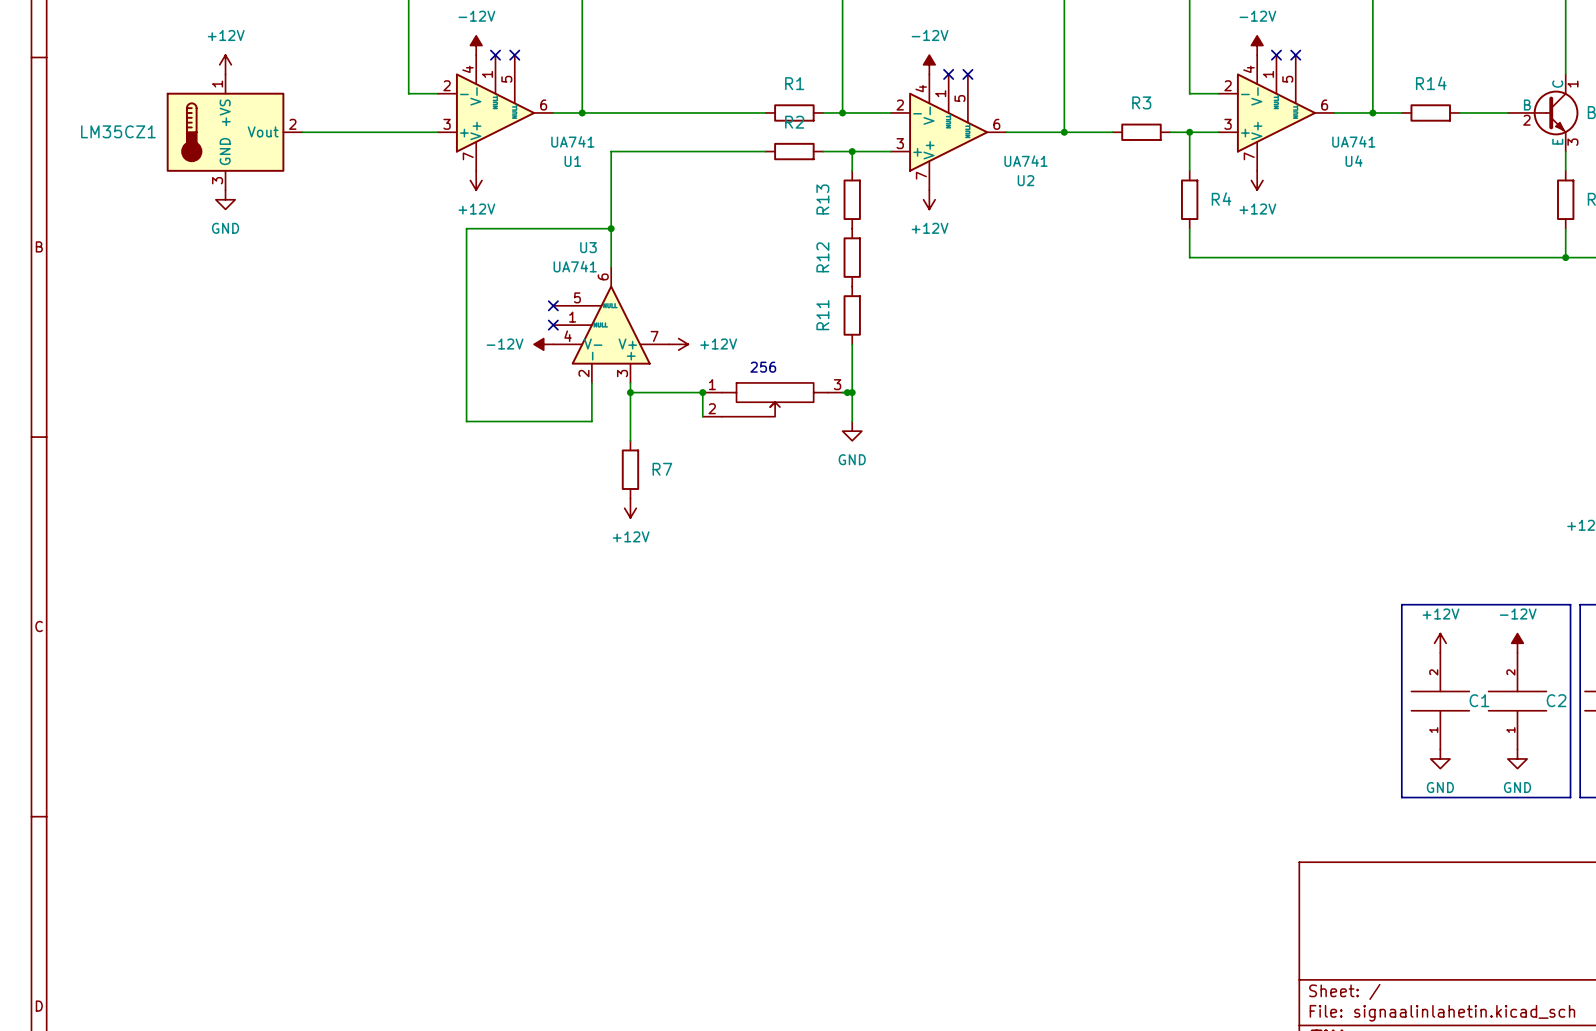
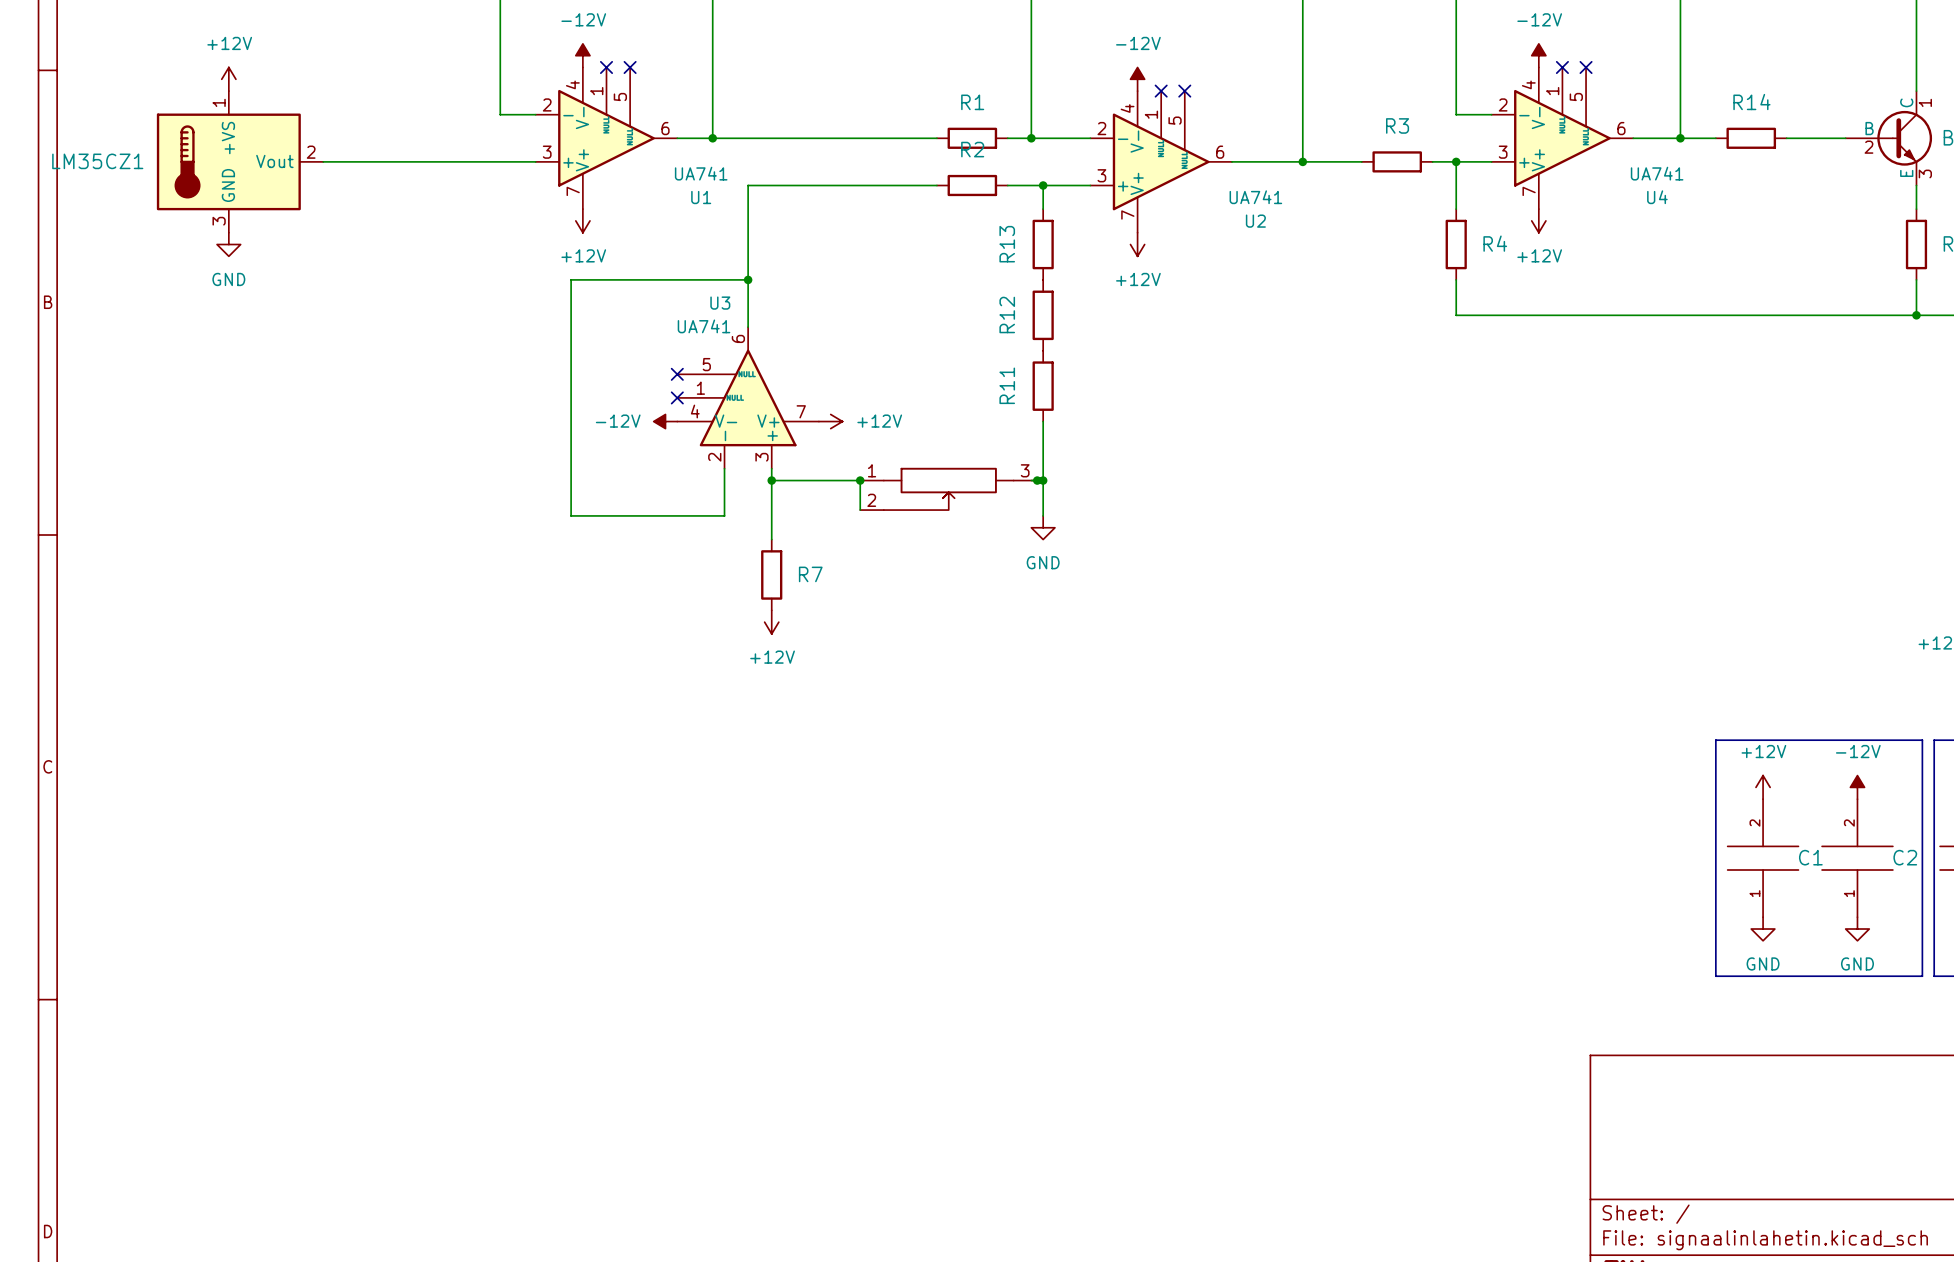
power symbol position: +12V (225, 64) -> +12V (228, 79)
LM35CZ1 position: (234, 132) -> (240, 161)
power symbol position: GND (225, 199) -> GND (228, 244)
text: 256 (763, 367) -> none

